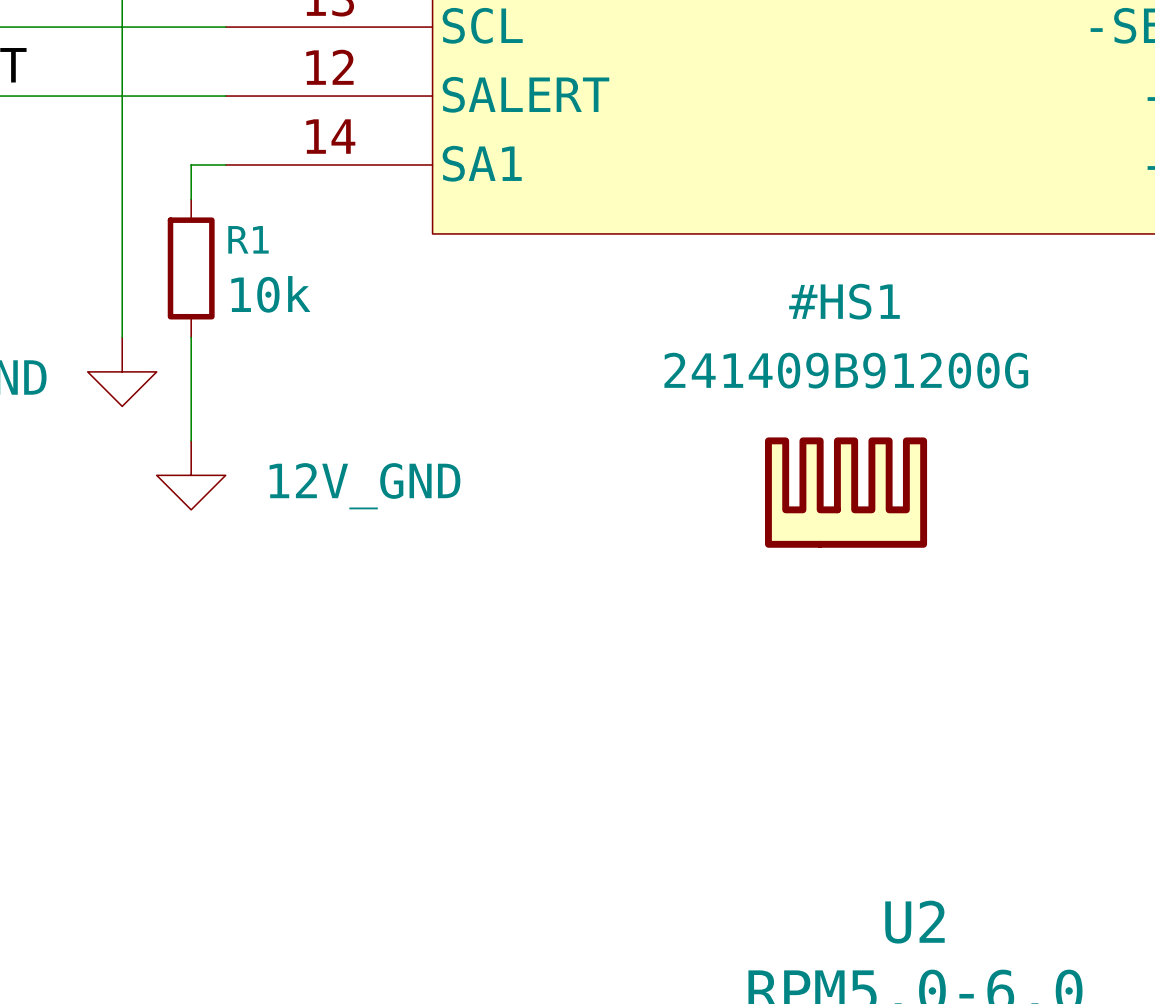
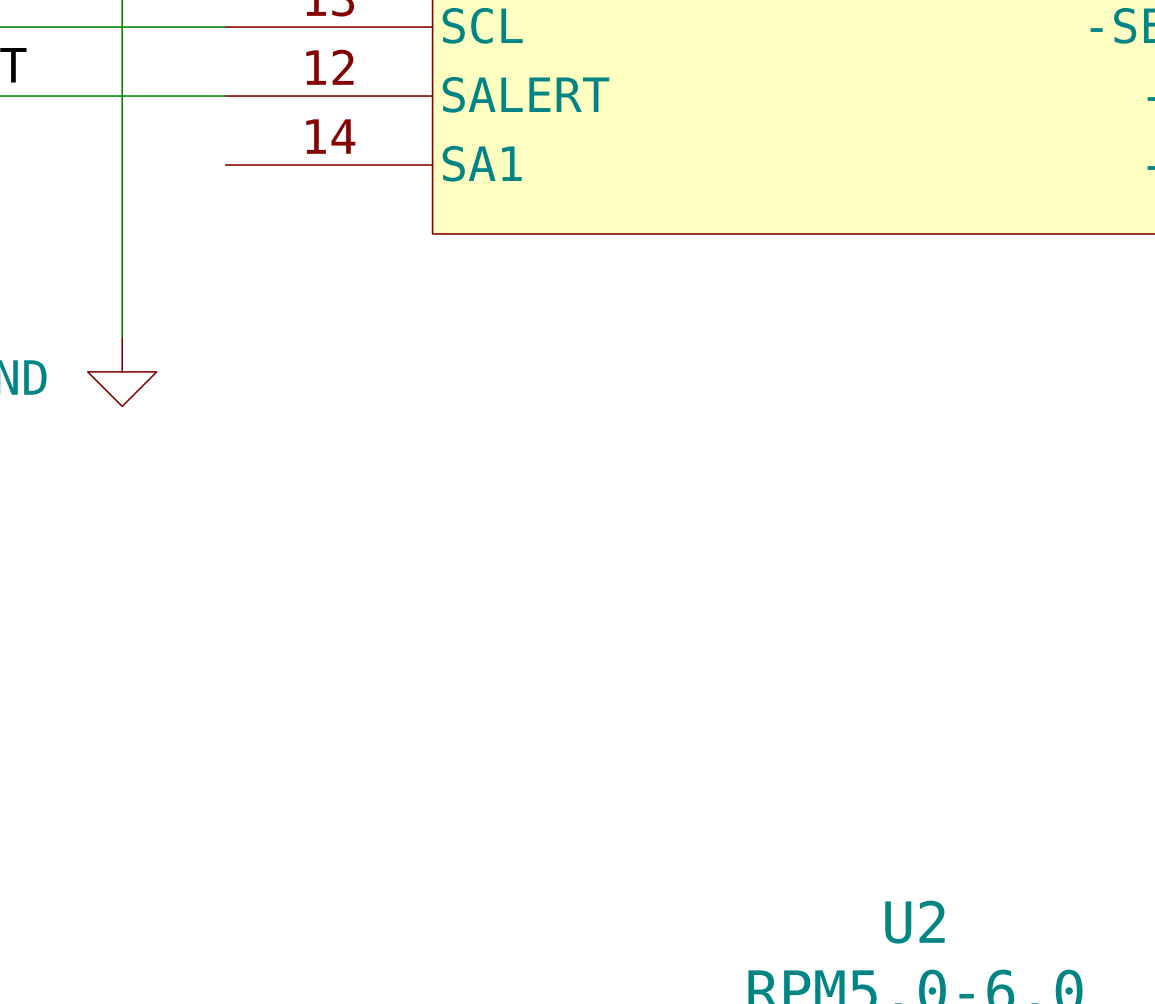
wire: (225, 164) (191, 164) (191, 199) -> none
R1: 10k (191, 268) -> none
wire: (191, 337) (191, 440) -> none
power symbol: 12V_GND (191, 475) -> none
#HS1: 241409B91200G (846, 492) -> none

